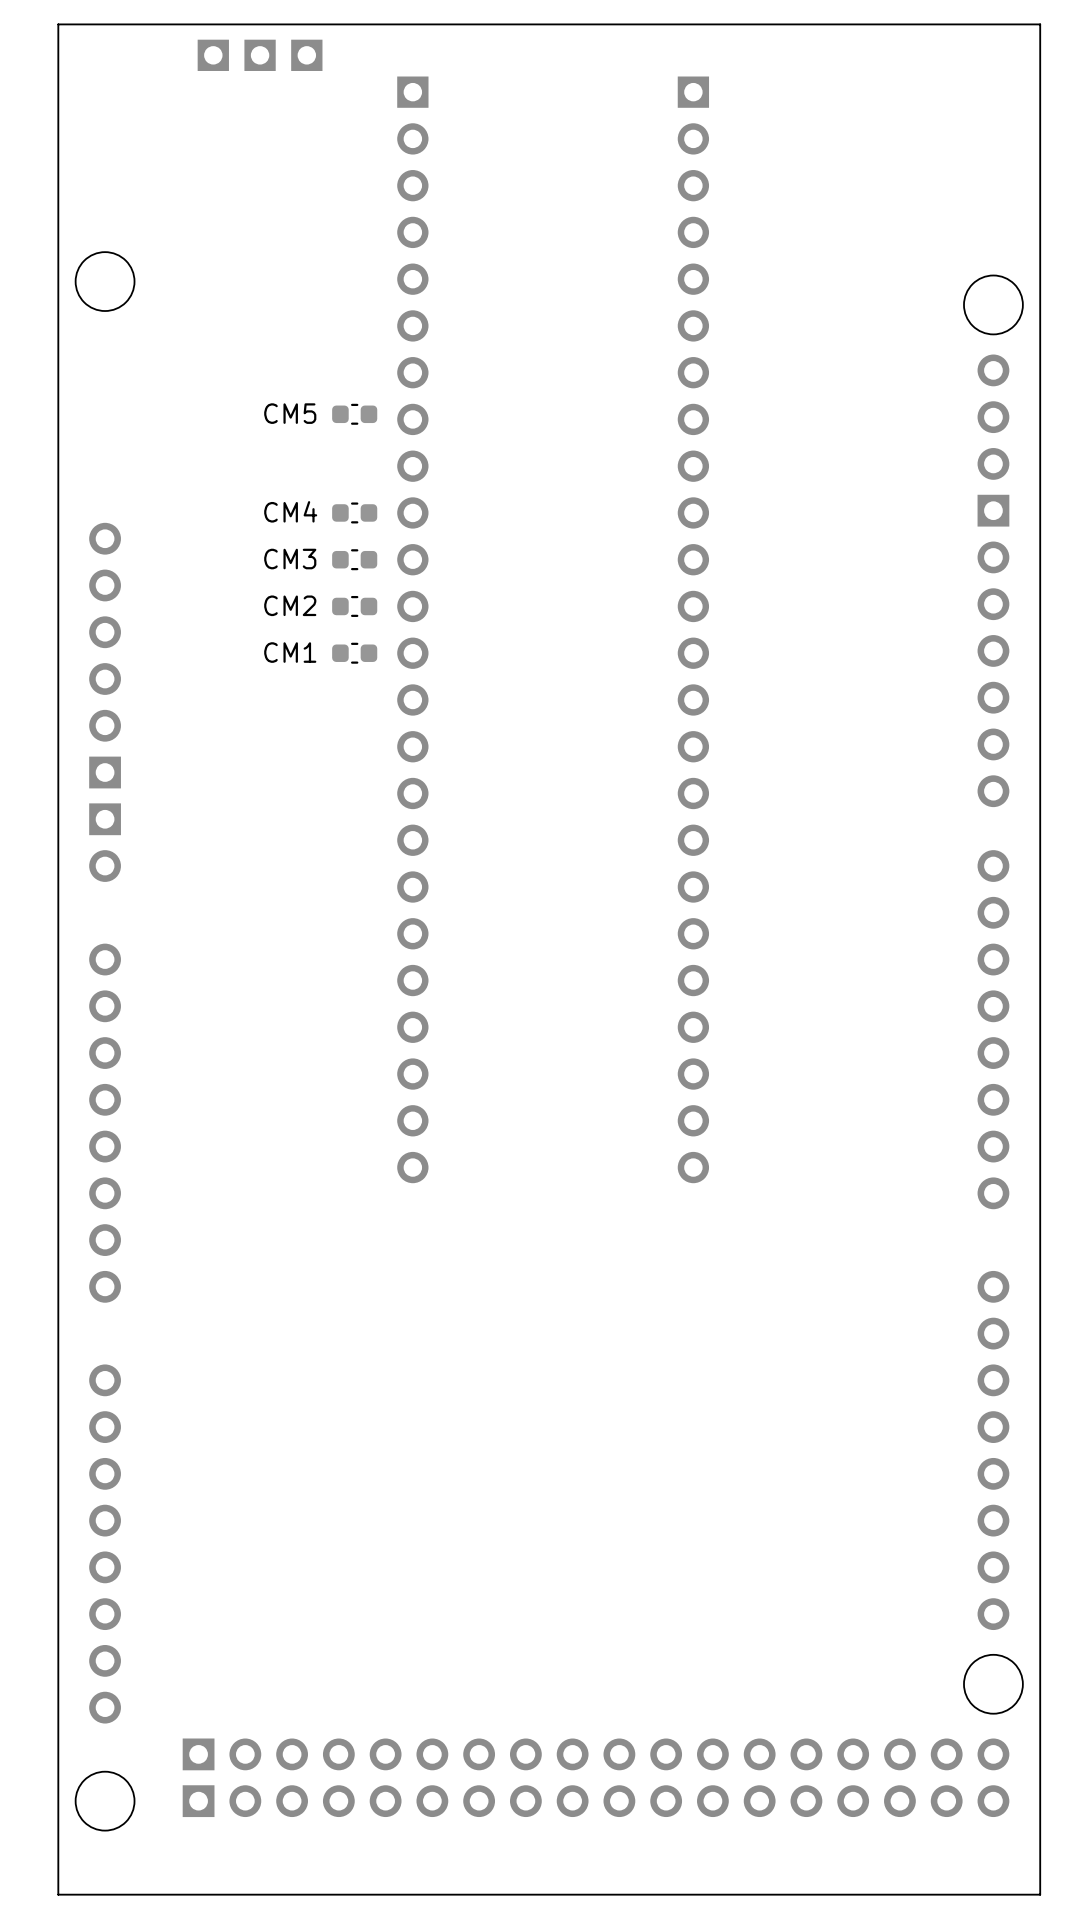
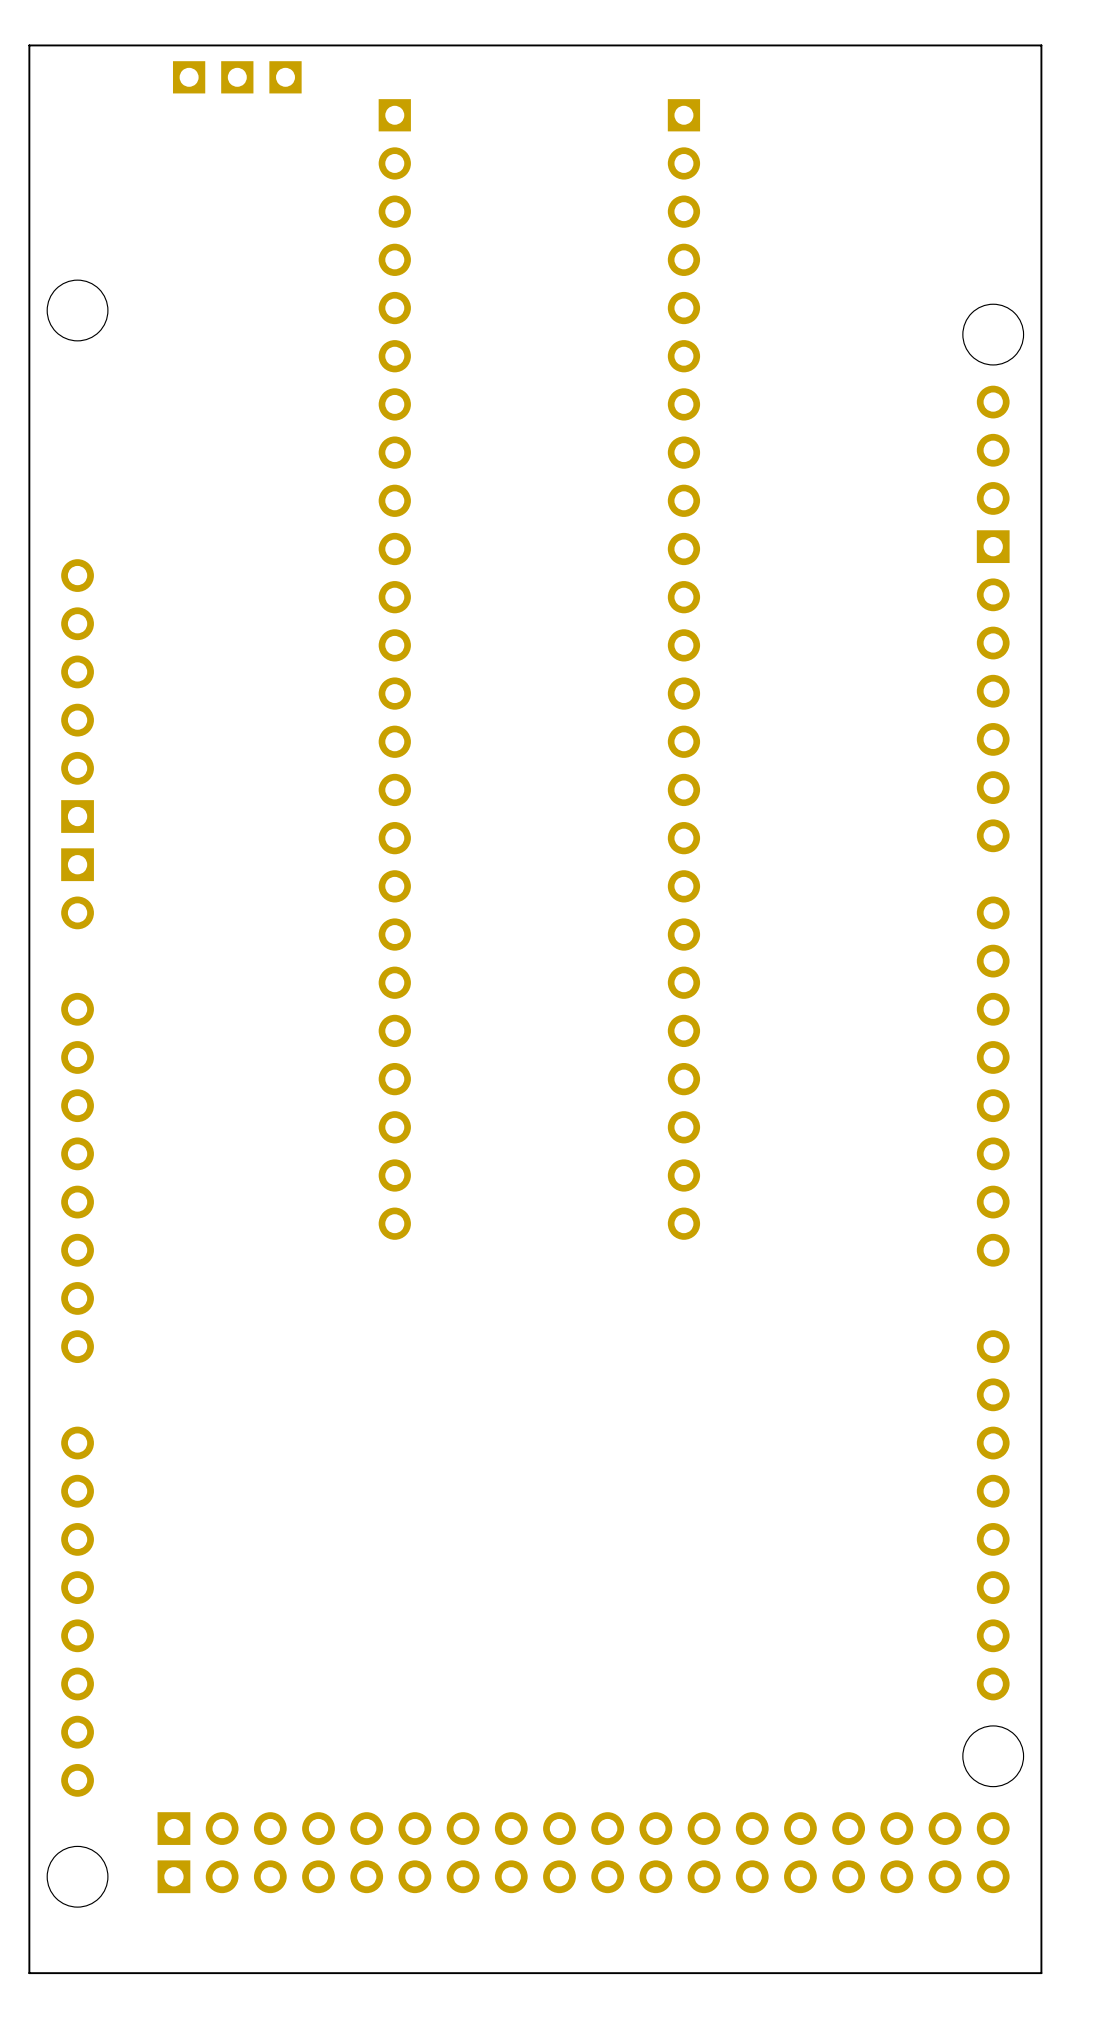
CM5: (354, 414) -> none
CM4: (354, 512) -> none
CM3: (354, 559) -> none
CM2: (354, 606) -> none
CM1: (354, 653) -> none

